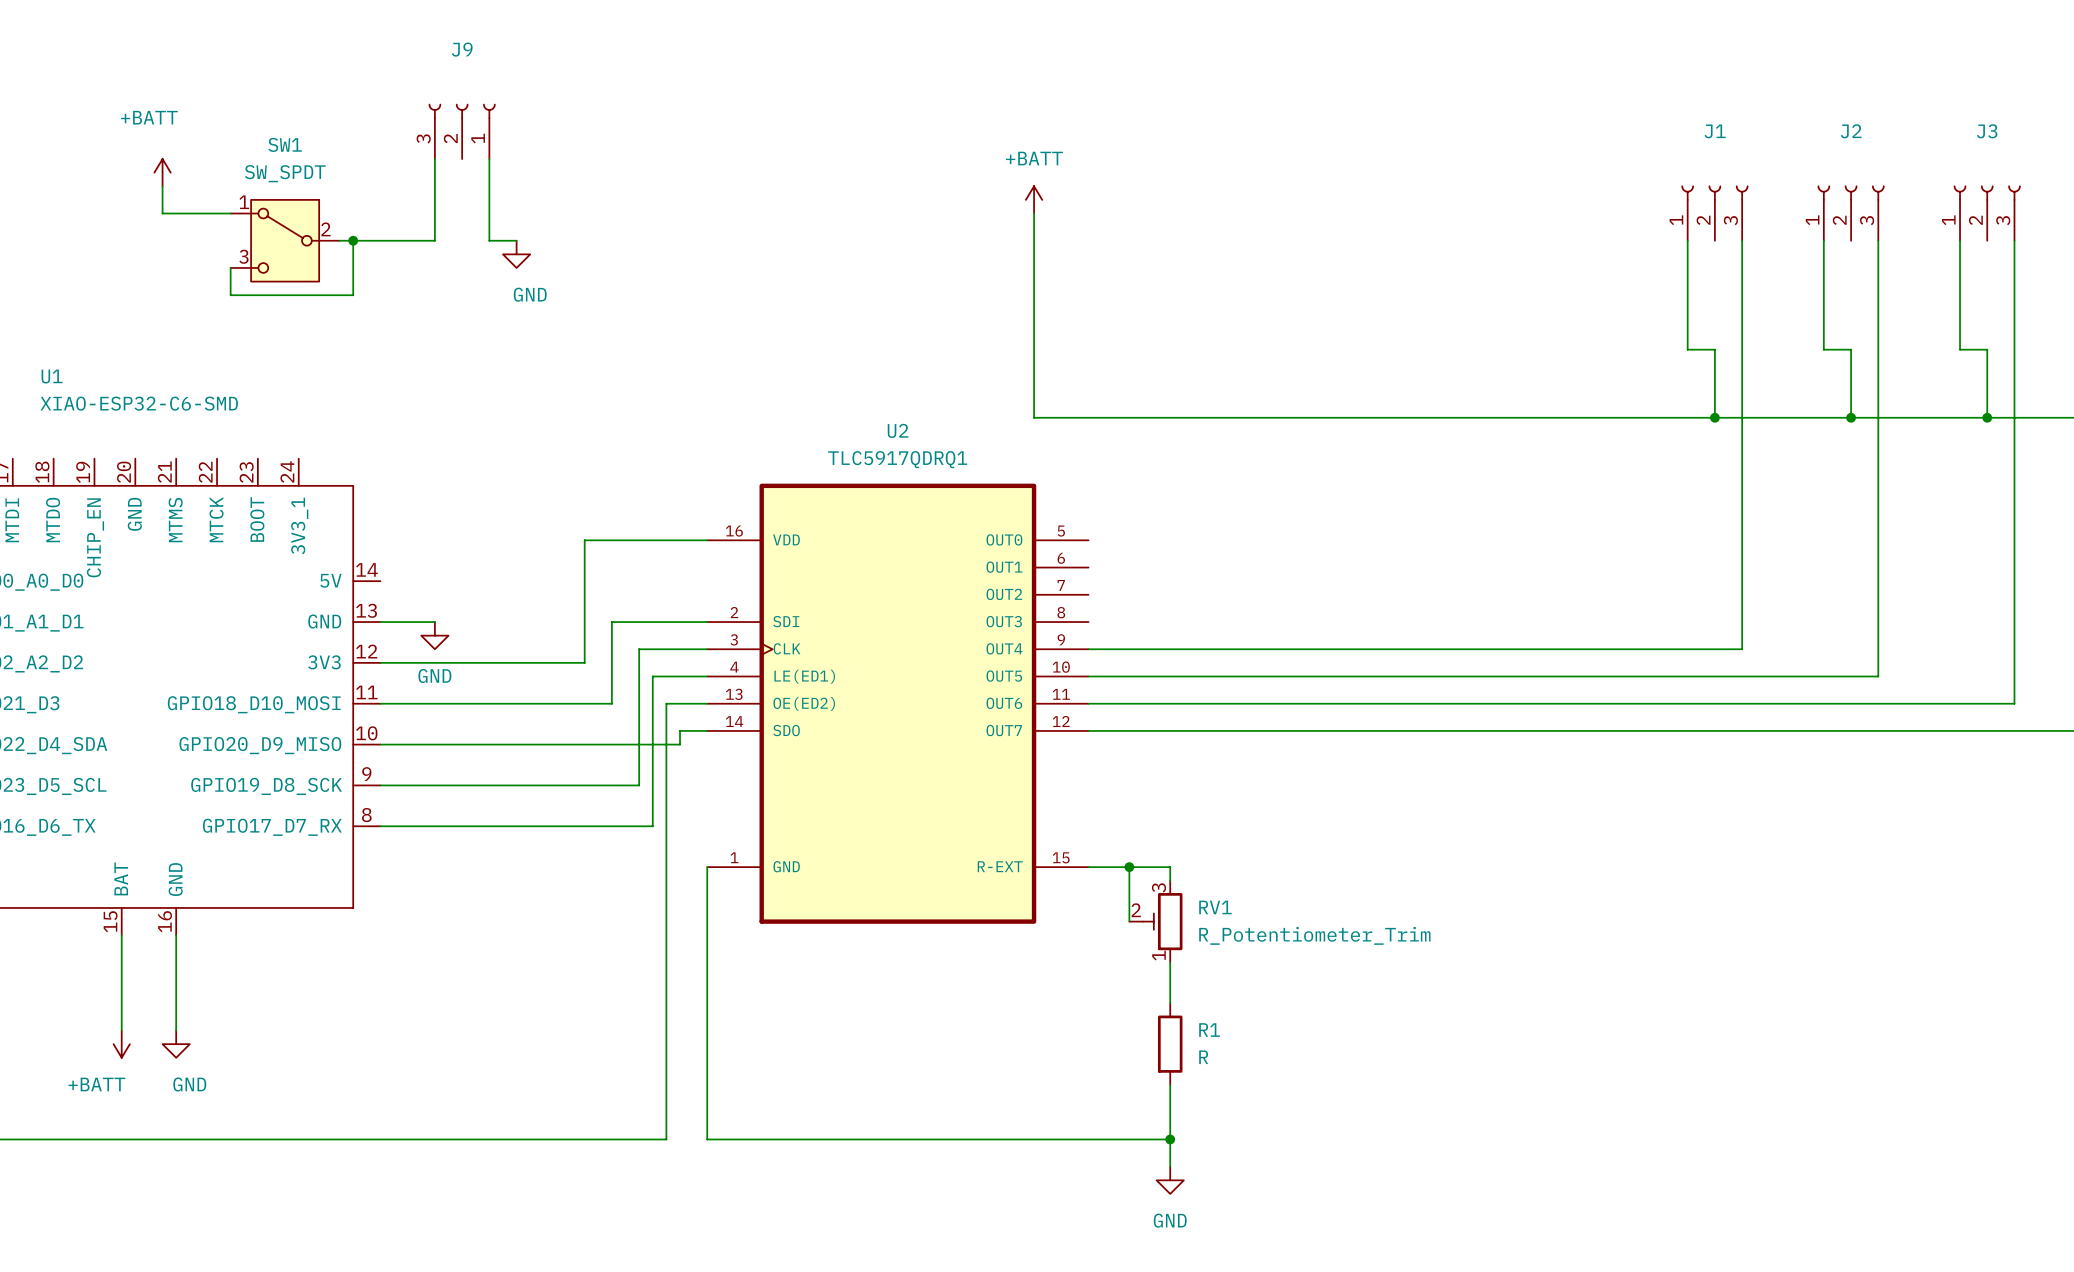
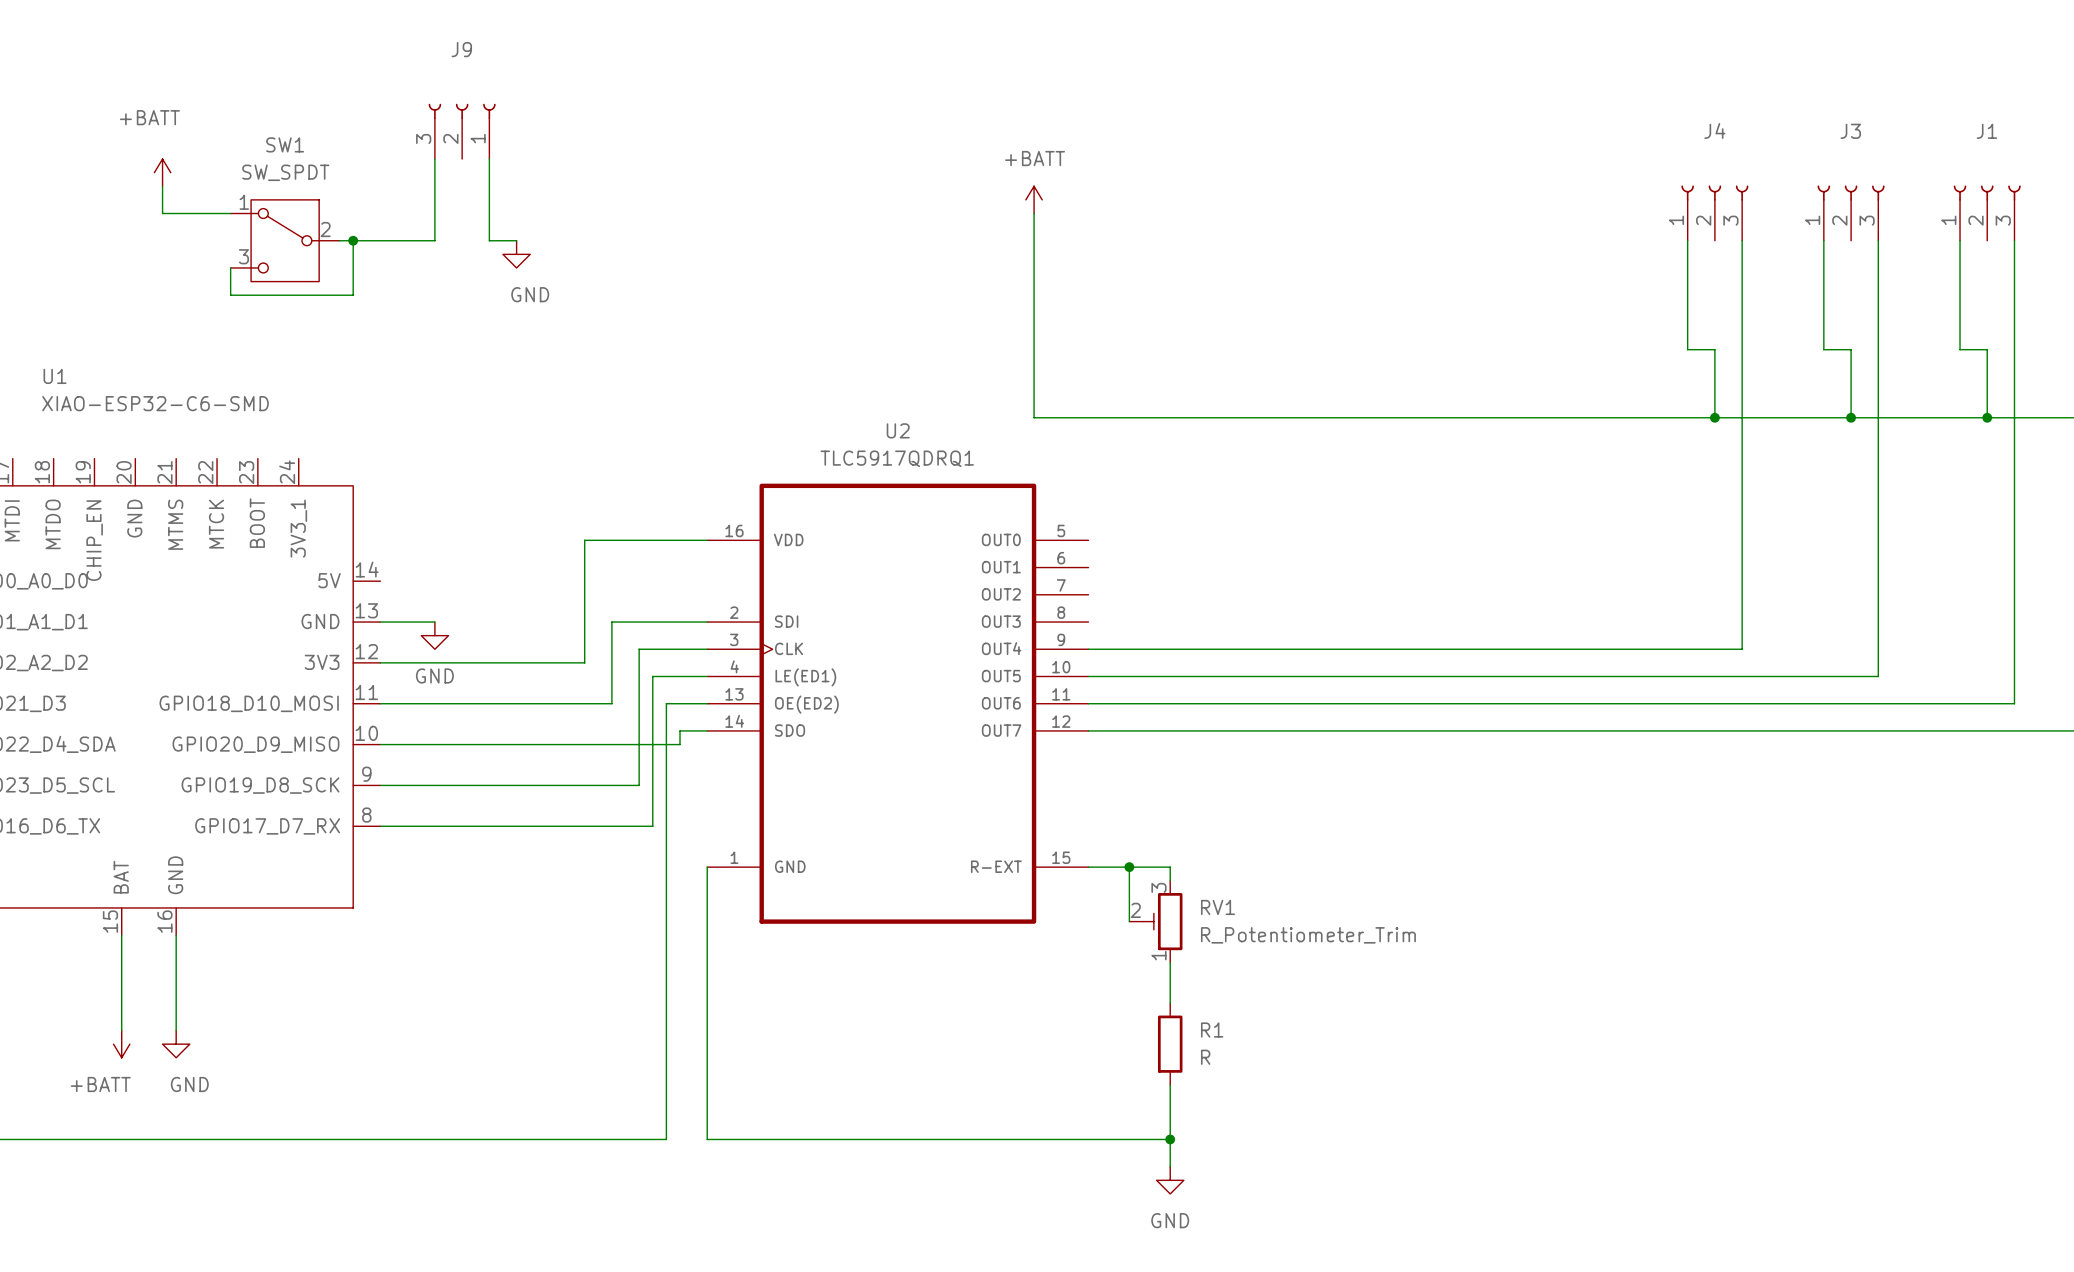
J1 name: J1 (1715, 131) -> J4 (1714, 130)
J2 name: J2 (1851, 131) -> J3 (1850, 131)
J3 name: J3 (1987, 131) -> J1 (1986, 131)

